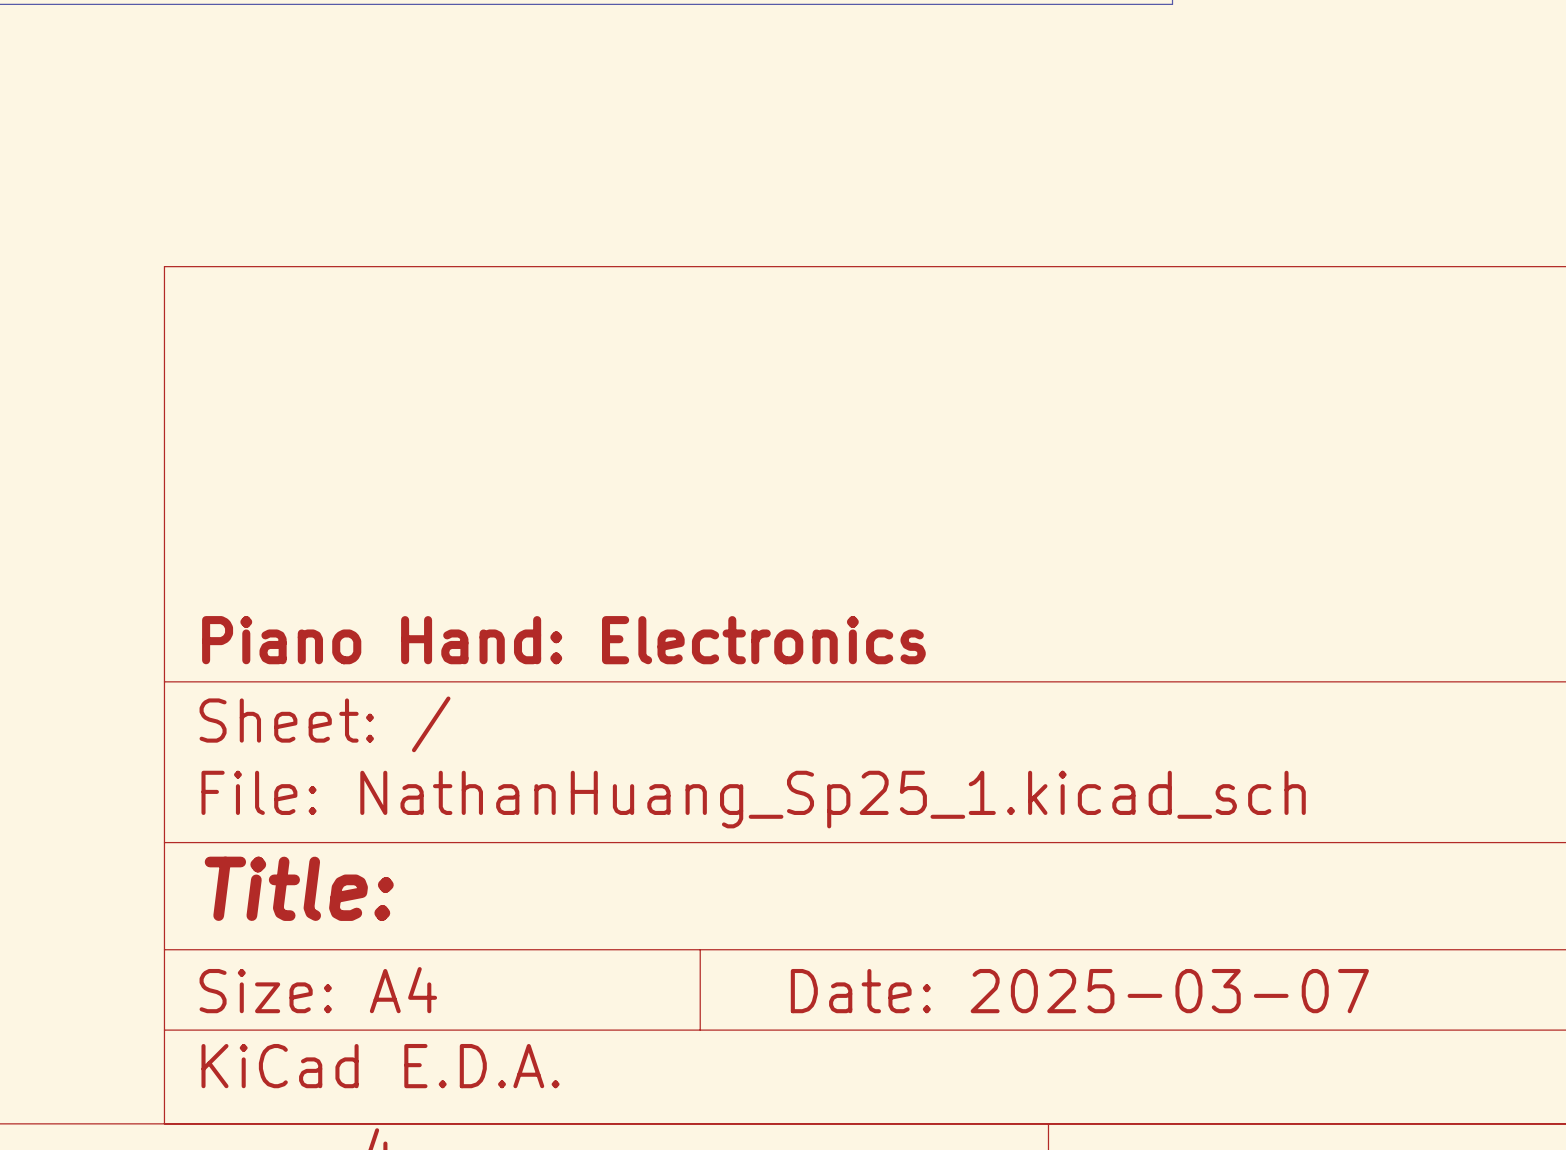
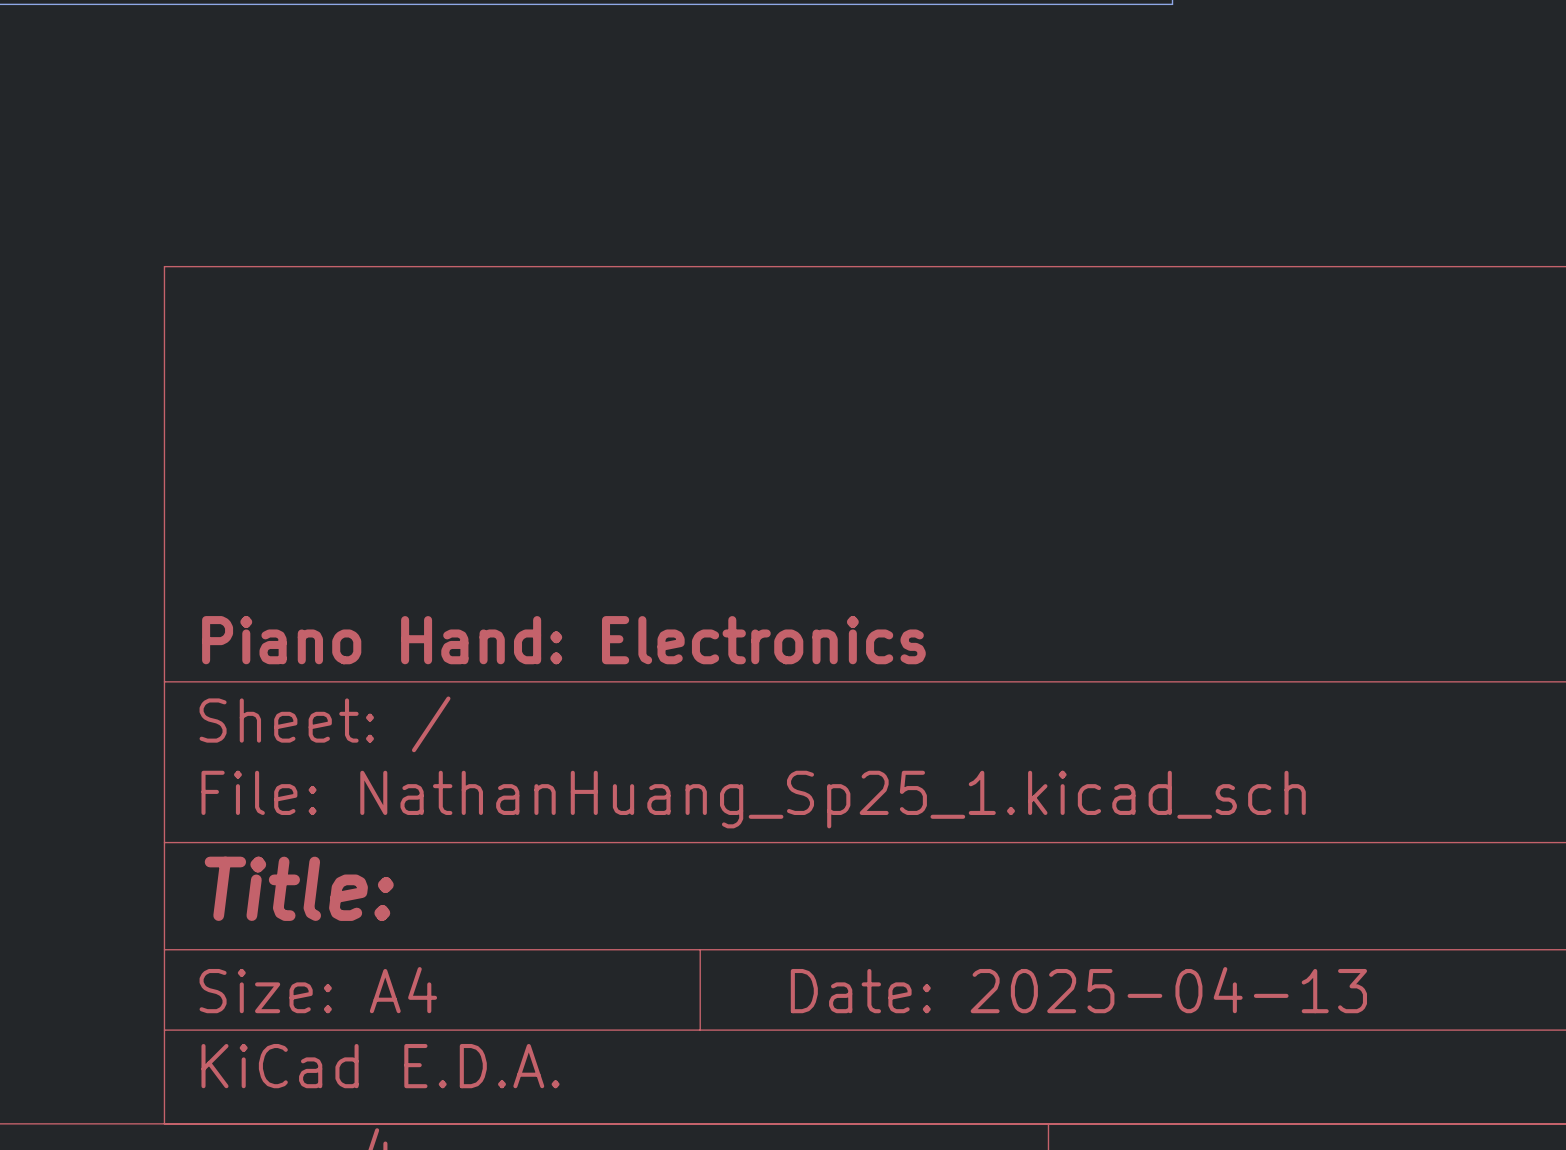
title block: Date: 2025-03-07 (1079, 991) -> Date: 2025-04-13 (1078, 990)

